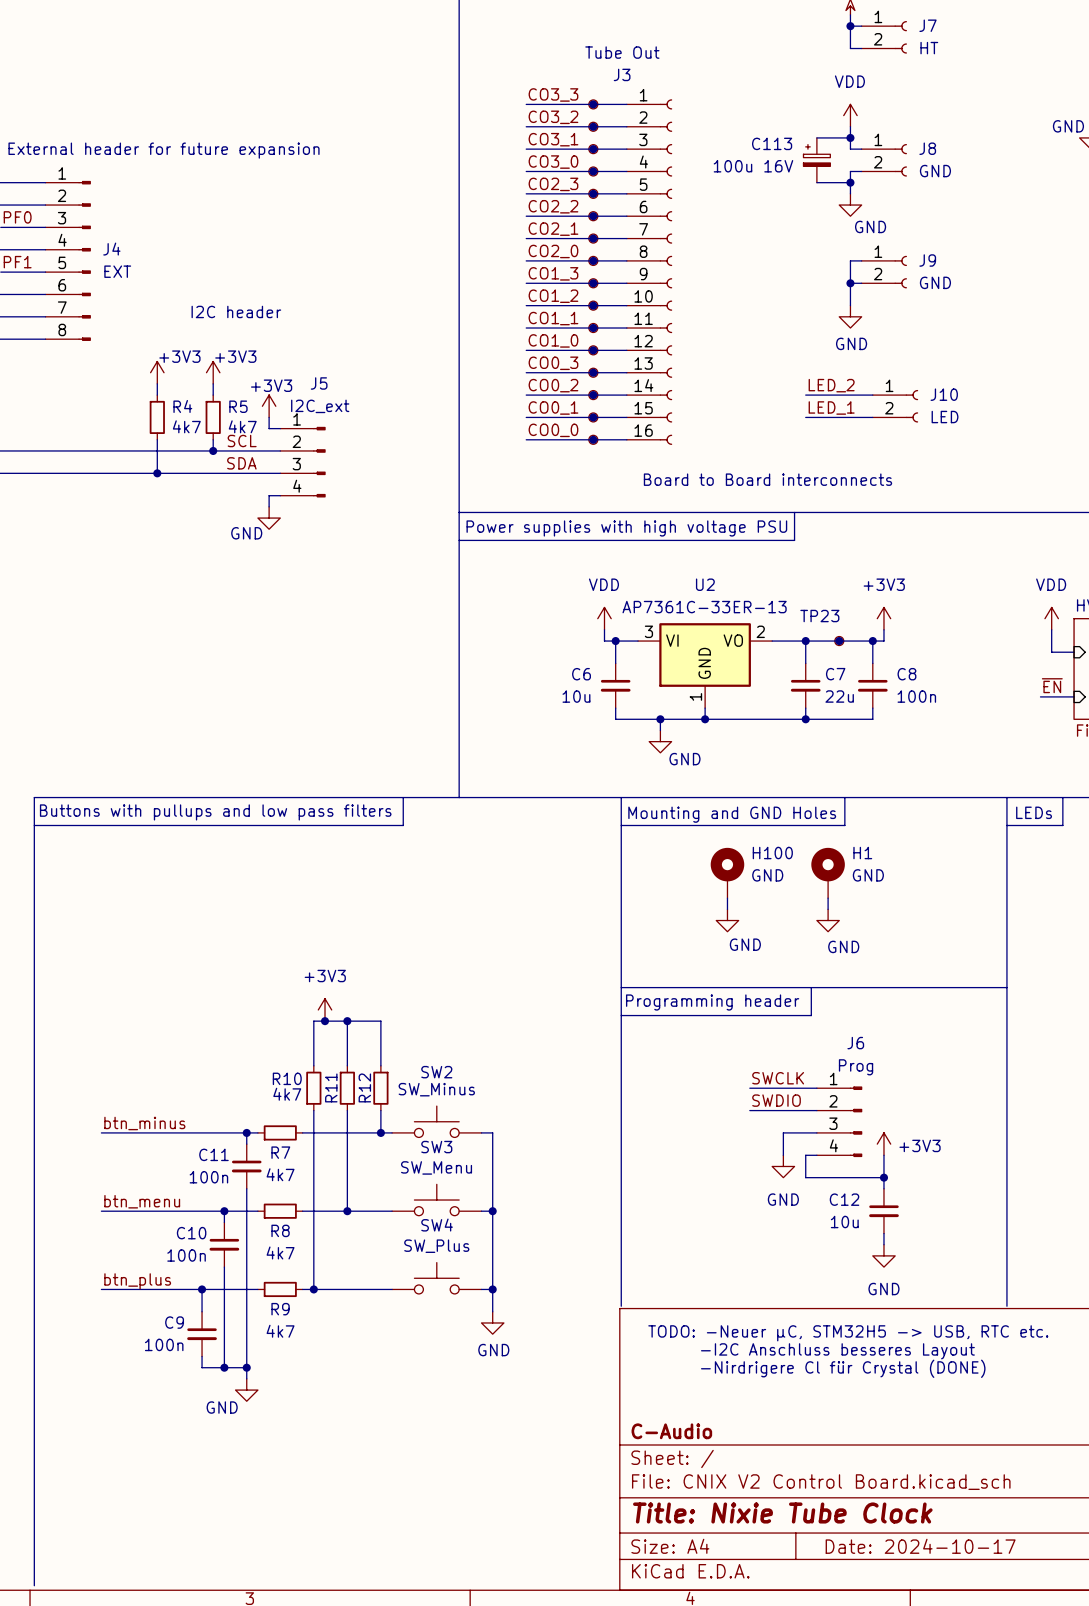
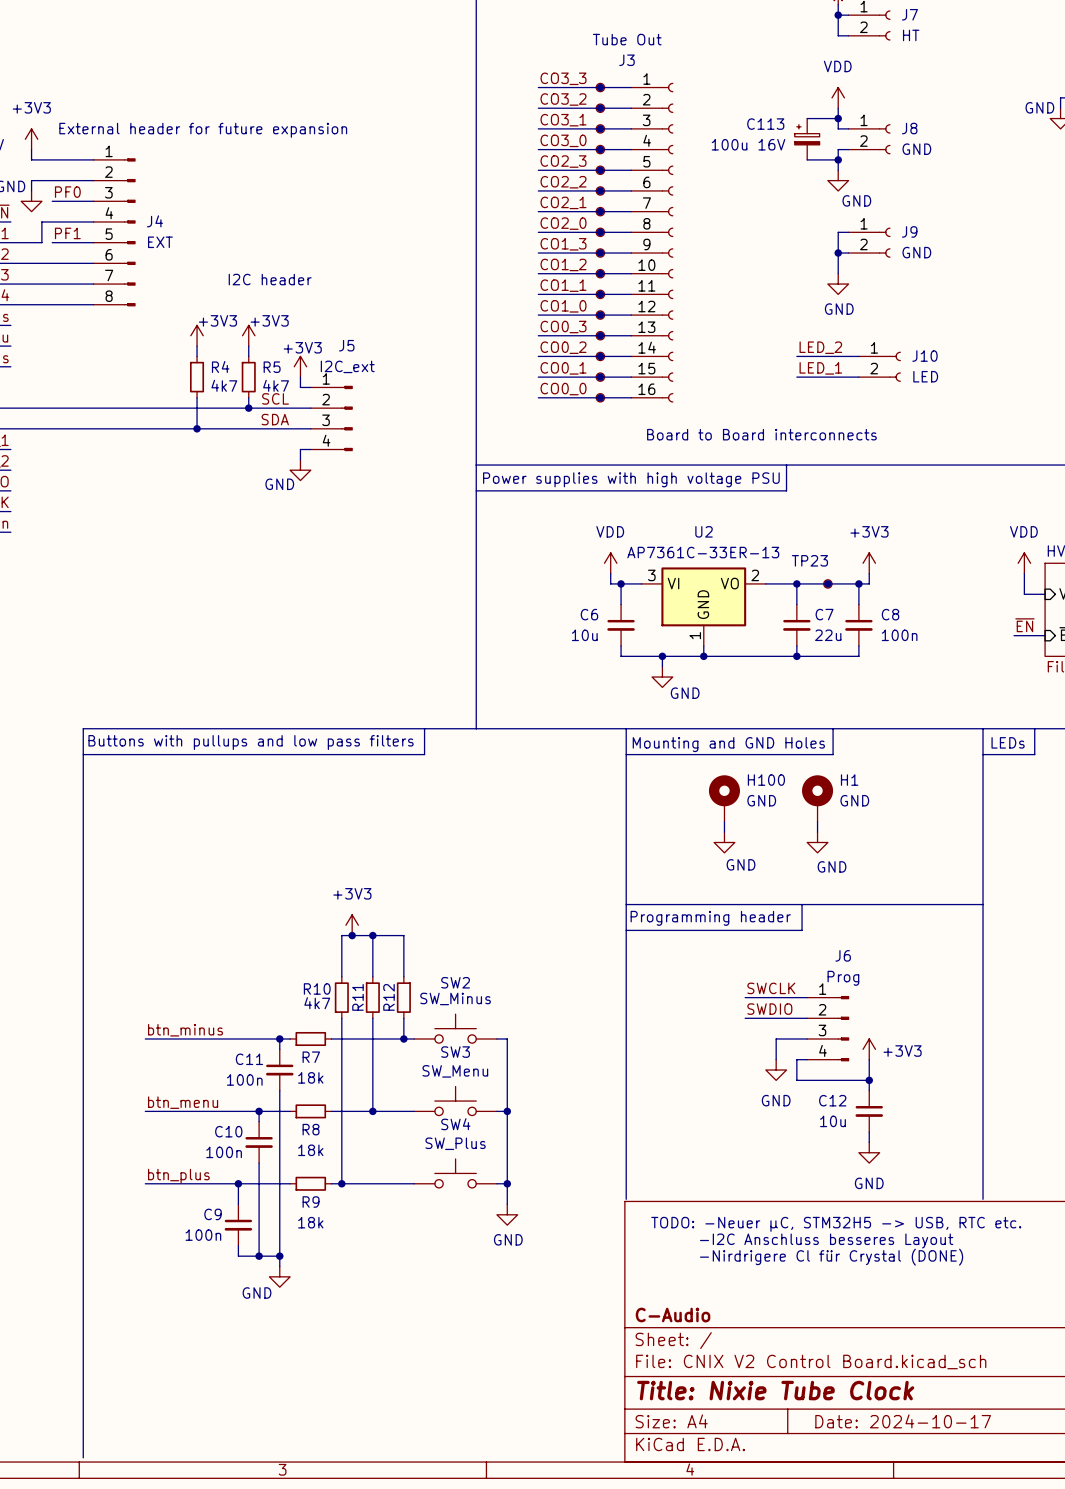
R7 value: 4k7 (280, 1174) -> 18k (310, 1077)
R8 value: 4k7 (280, 1252) -> 18k (310, 1150)
R9 value: 4k7 (280, 1331) -> 18k (310, 1222)

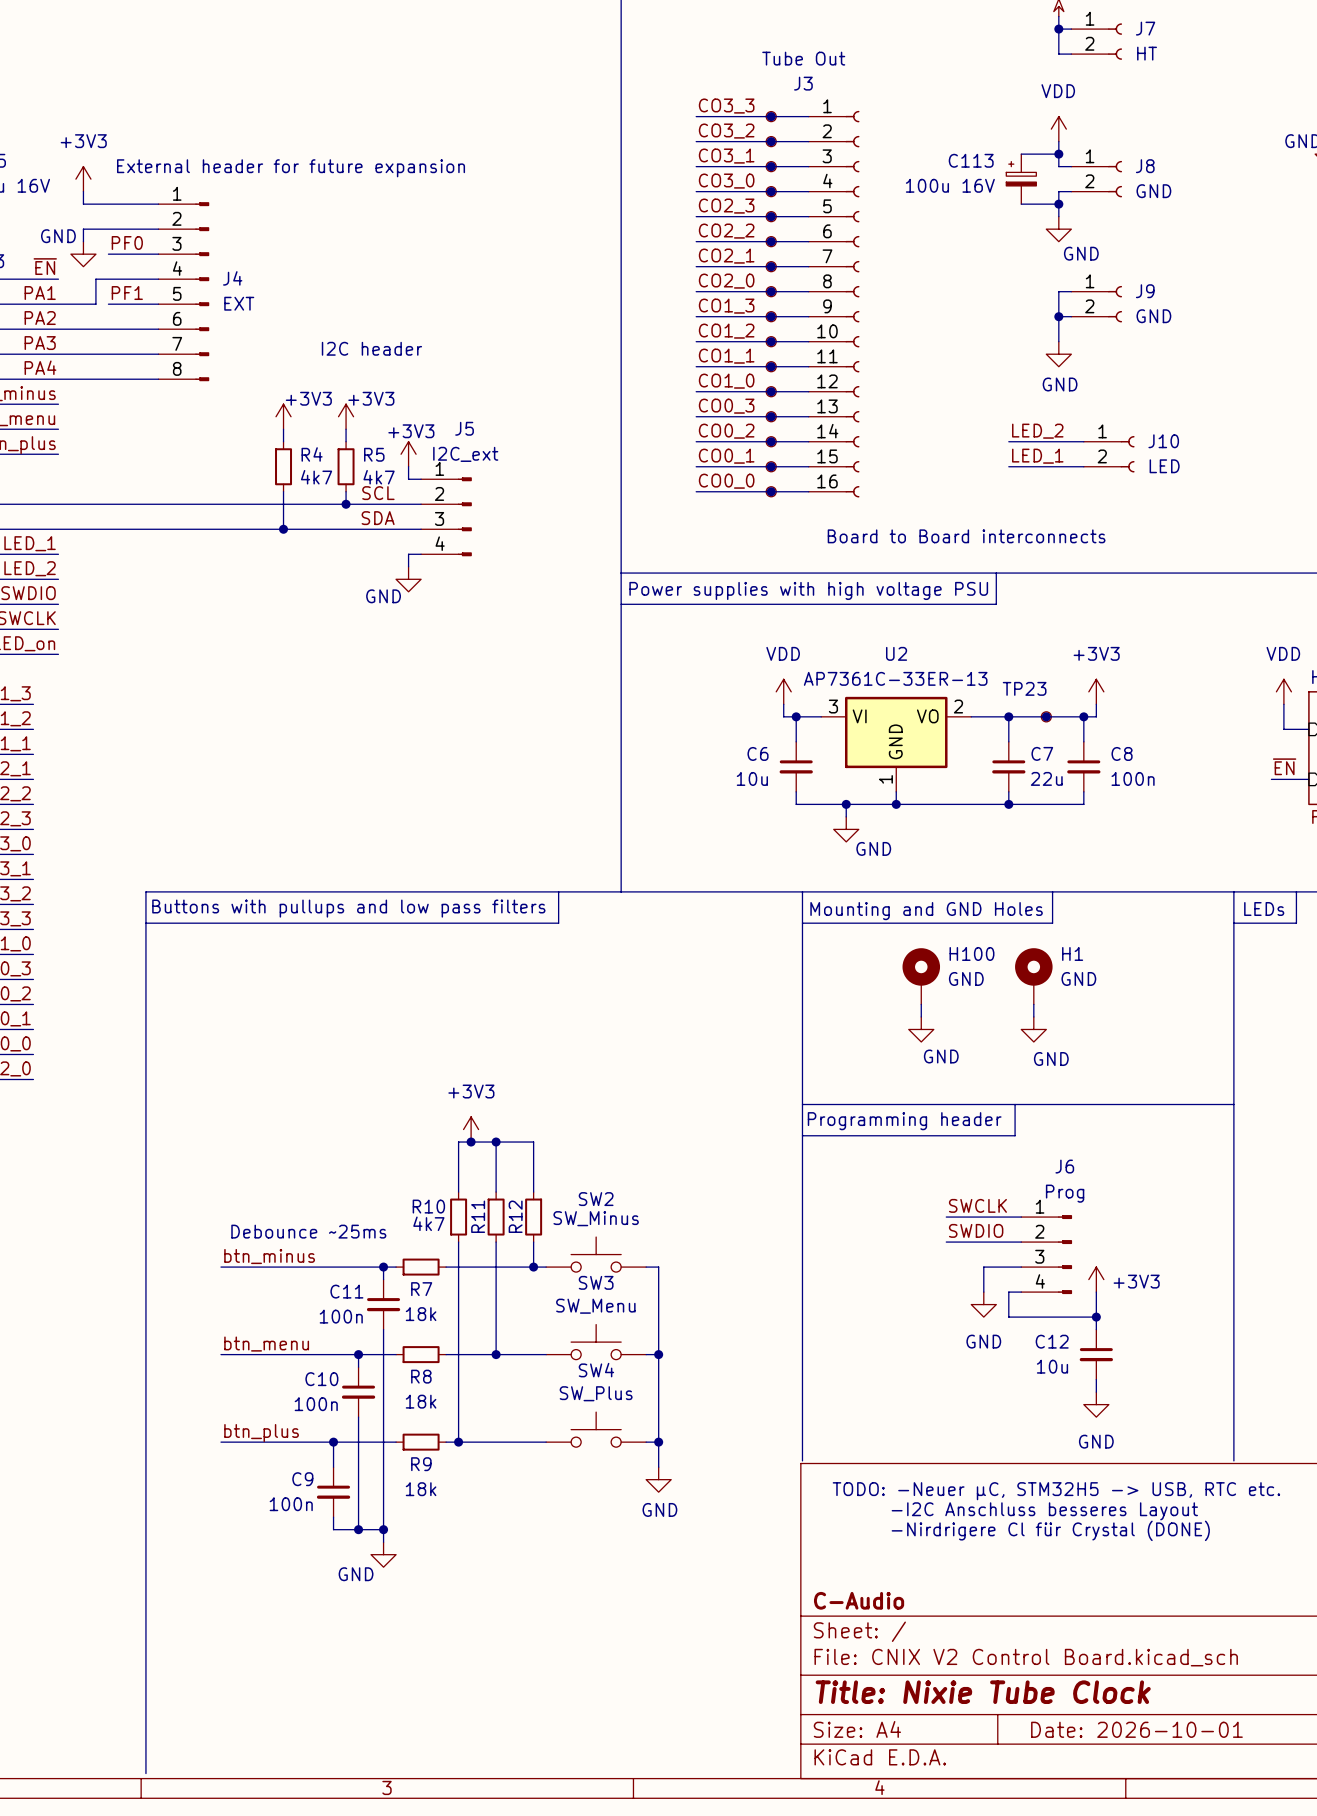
text: none -> Debounce ~25ms (308, 1231)
title block: Date: 2024-10-17 (903, 1421) -> Date: 2026-10-01 (1136, 1729)

